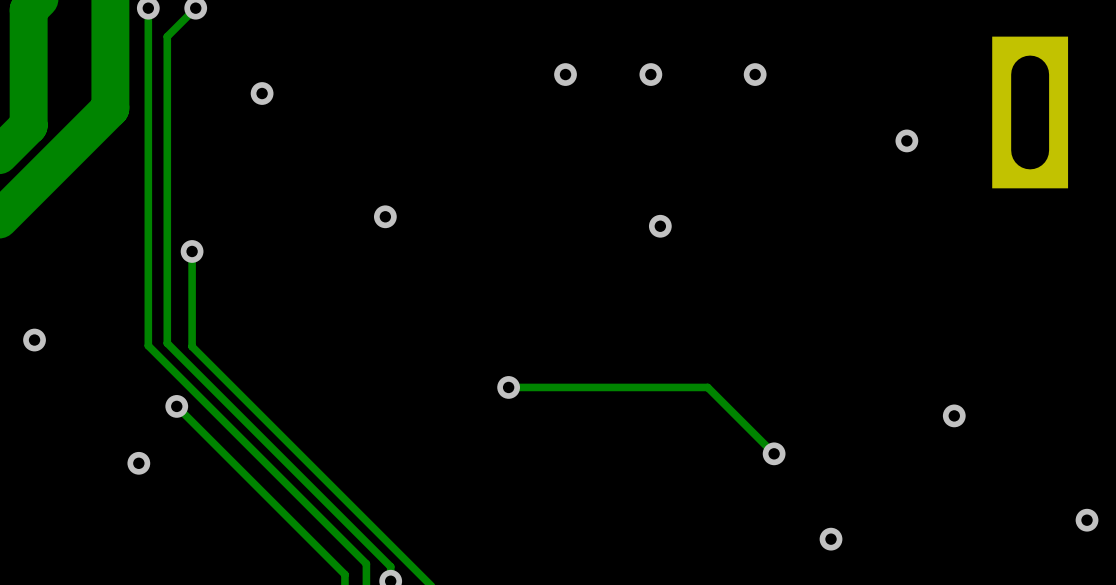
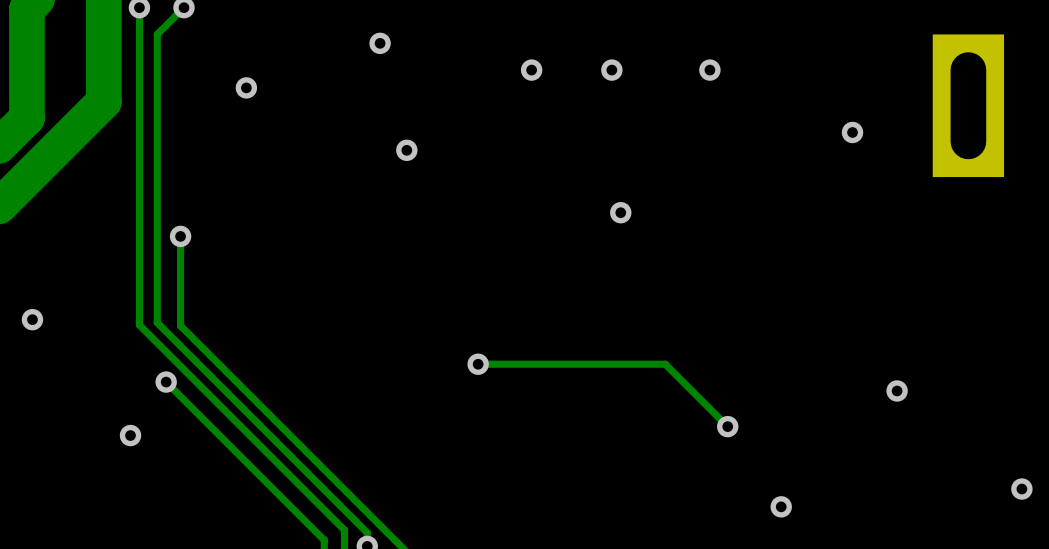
via: none -> (380, 43)
via position: (385, 216) -> (406, 150)

